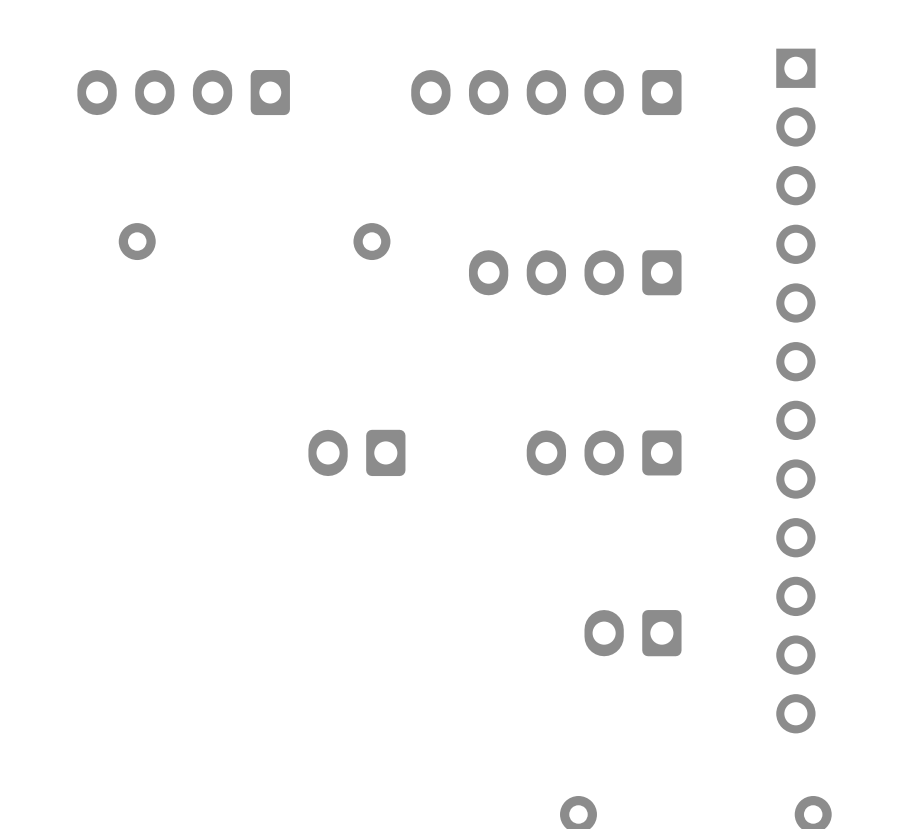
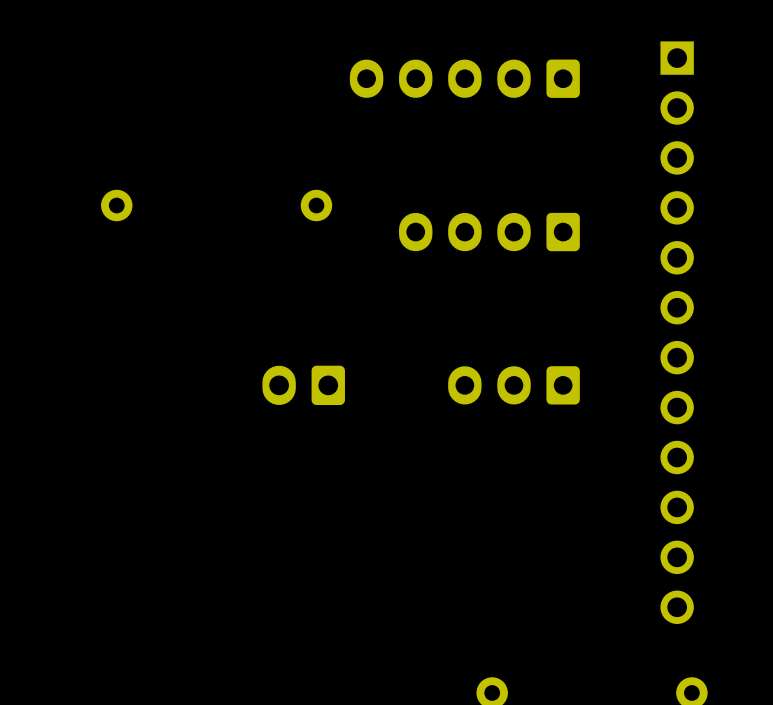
part: (183, 92) -> none
part: (633, 633) -> none

